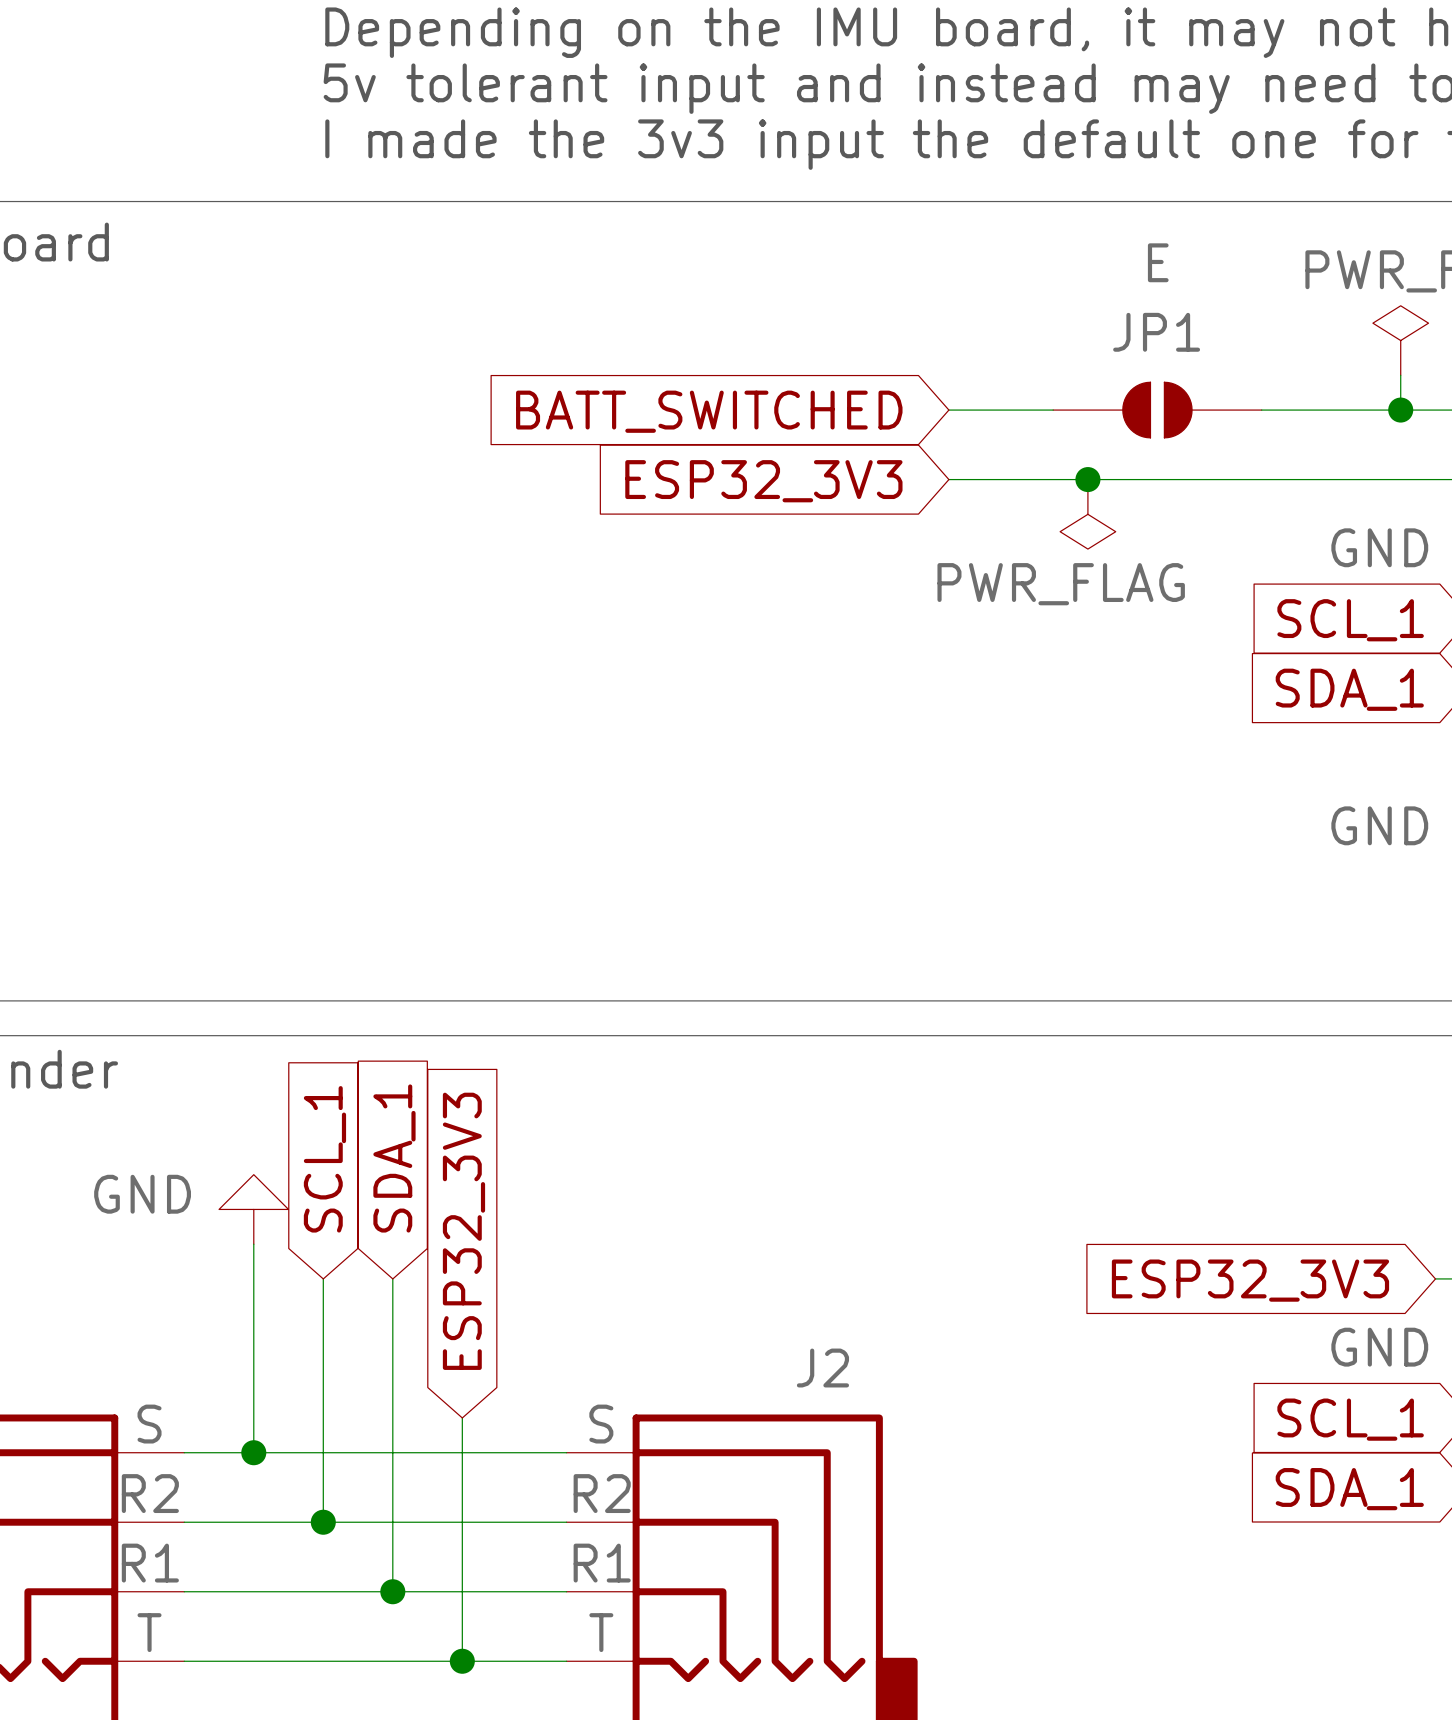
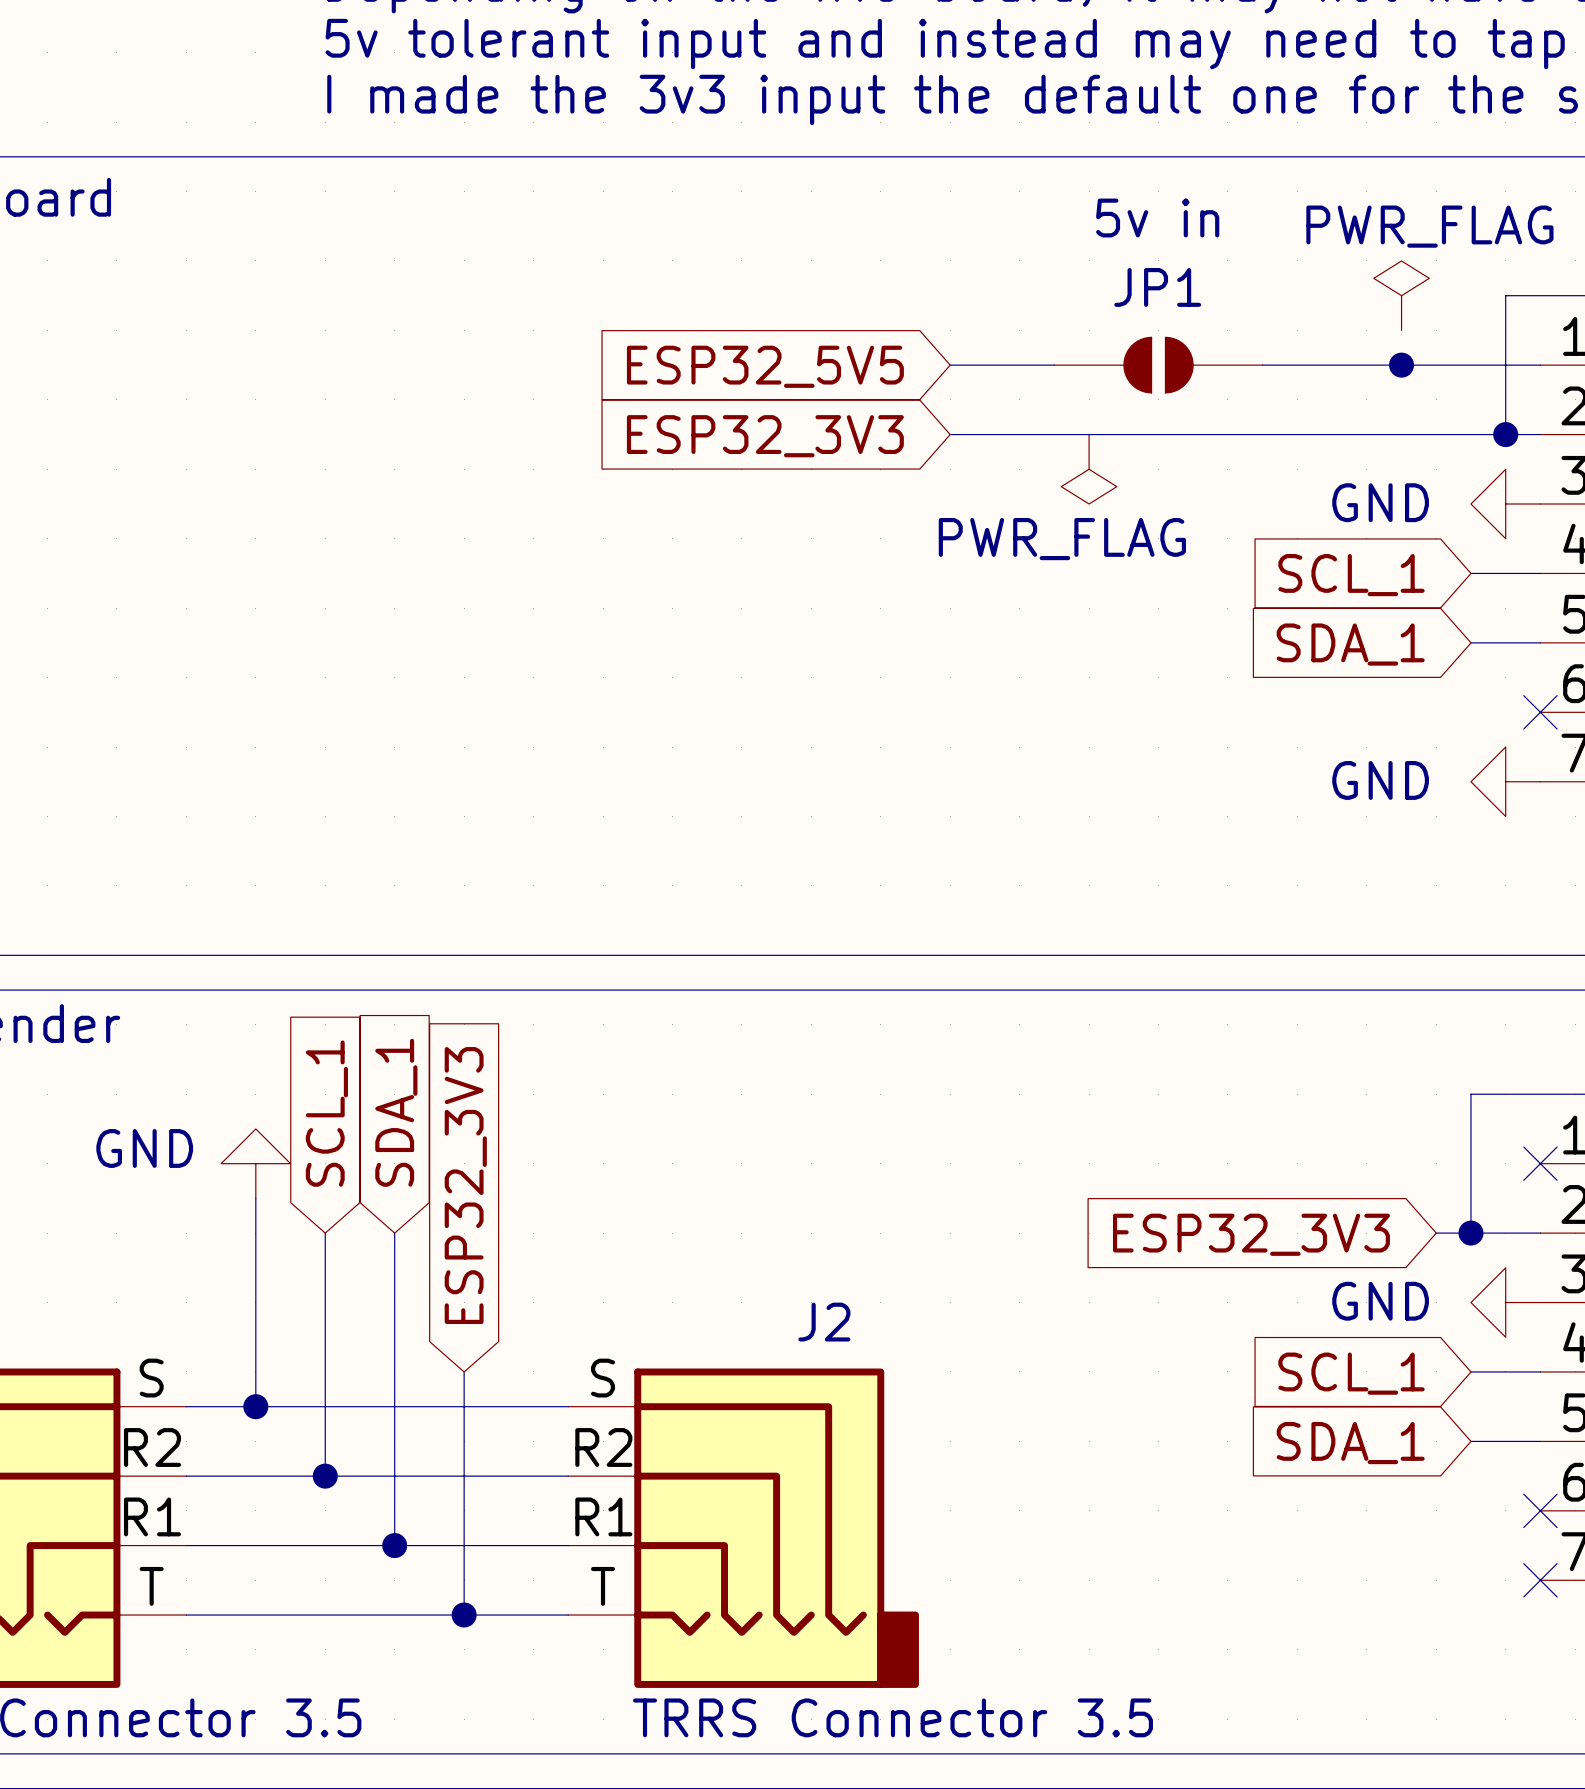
JP1 value: E (1158, 262) -> 5v in (1157, 218)
wire: (1400, 375) (1400, 410) -> none
global label: BATT_SWITCHED (709, 411) -> ESP32_5V5 (765, 366)
junction: (1087, 479) -> none

